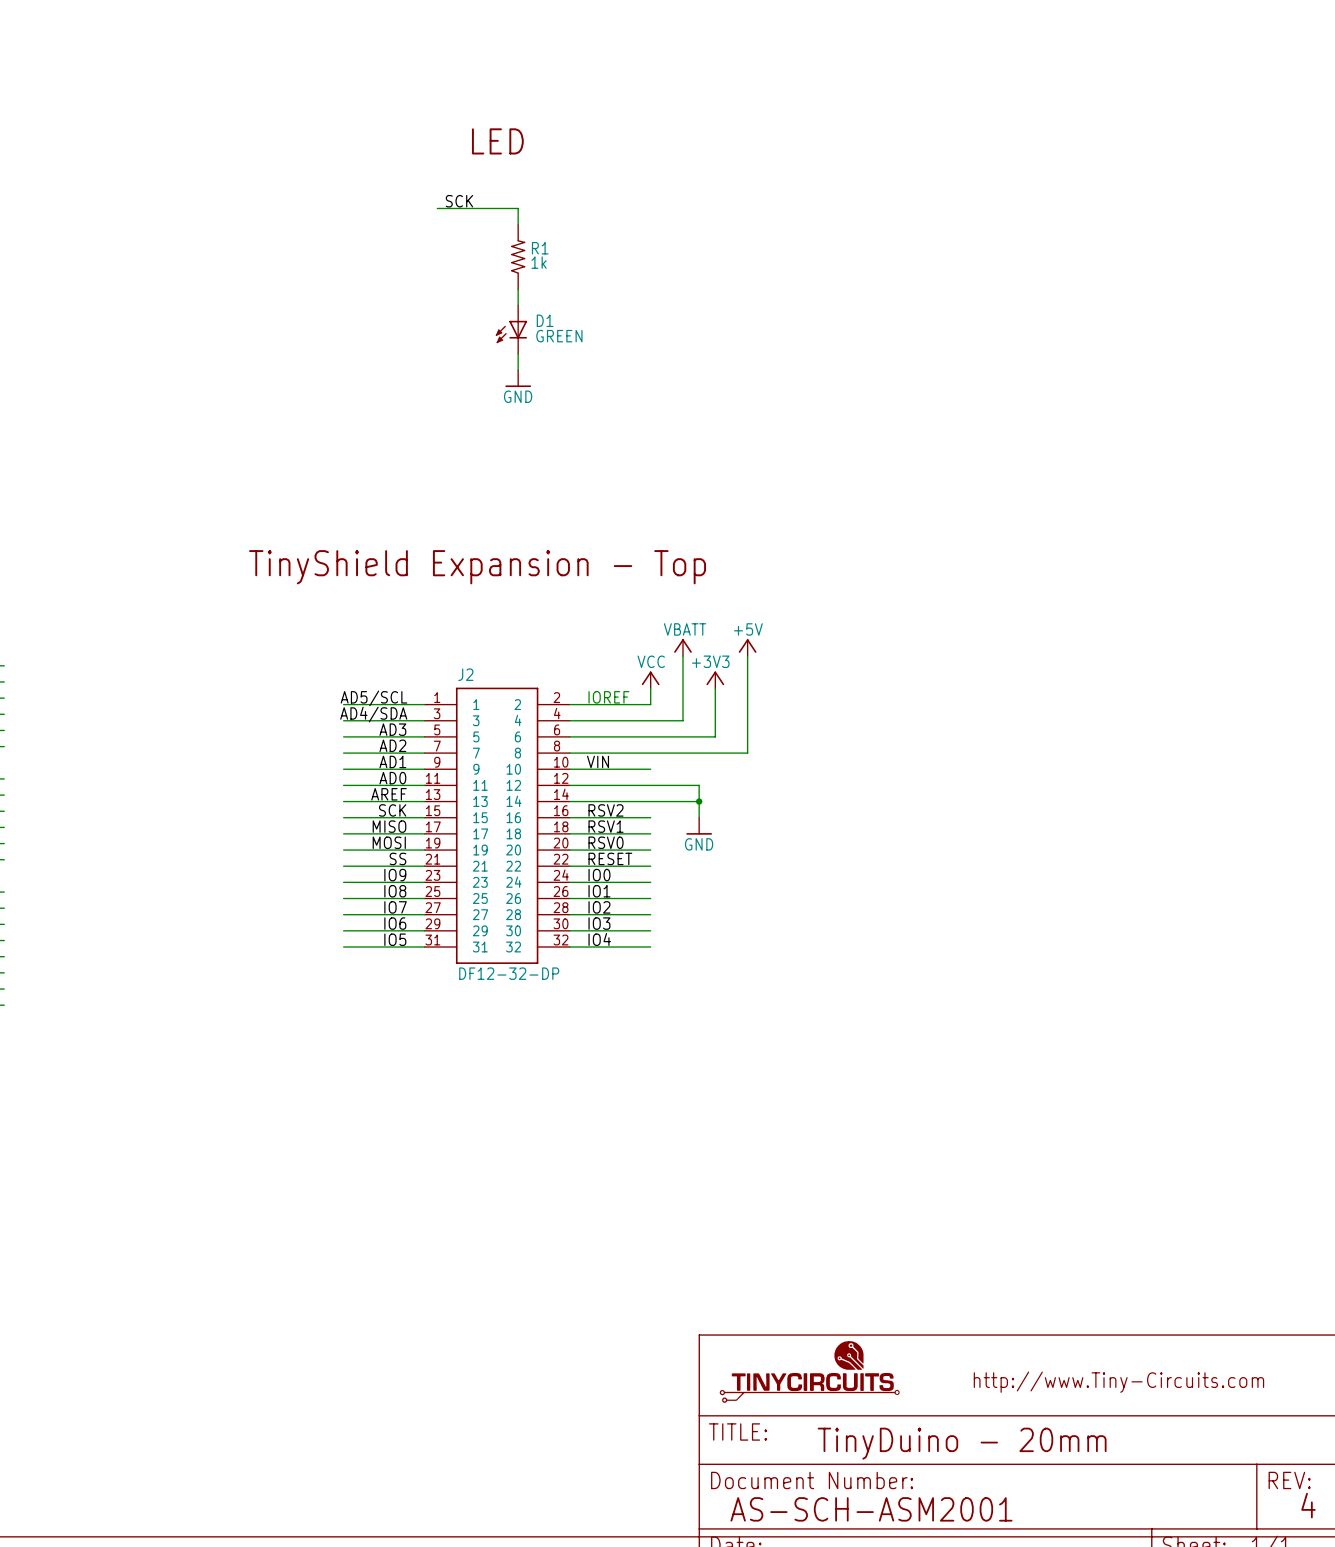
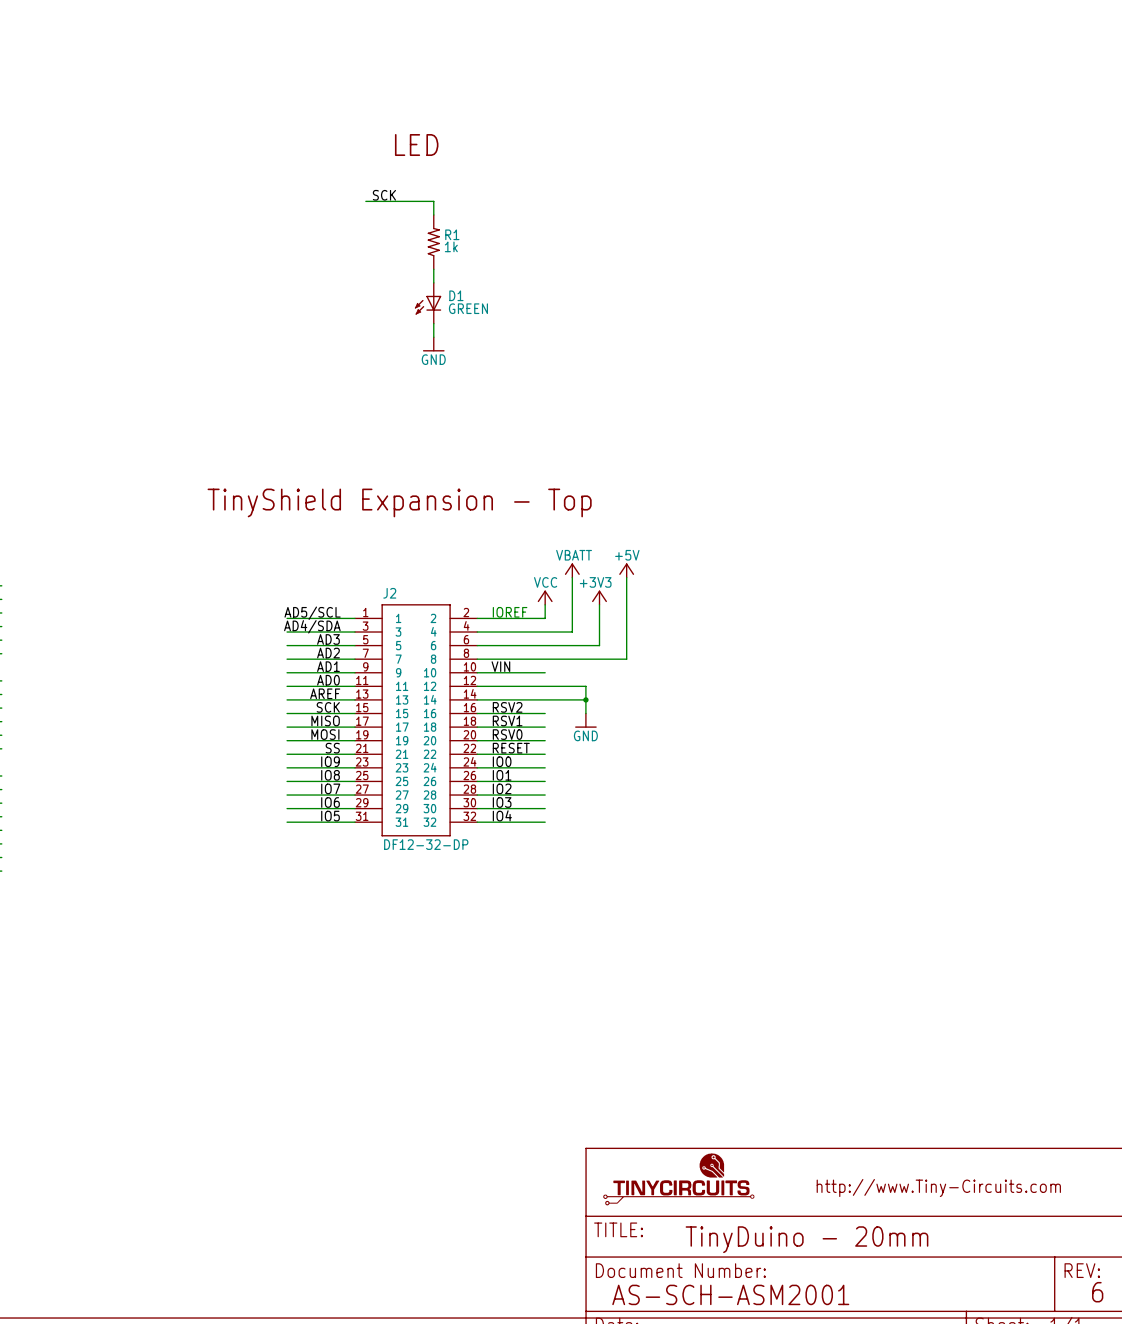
text: 4 (1308, 1505) -> 6 (1097, 1292)

